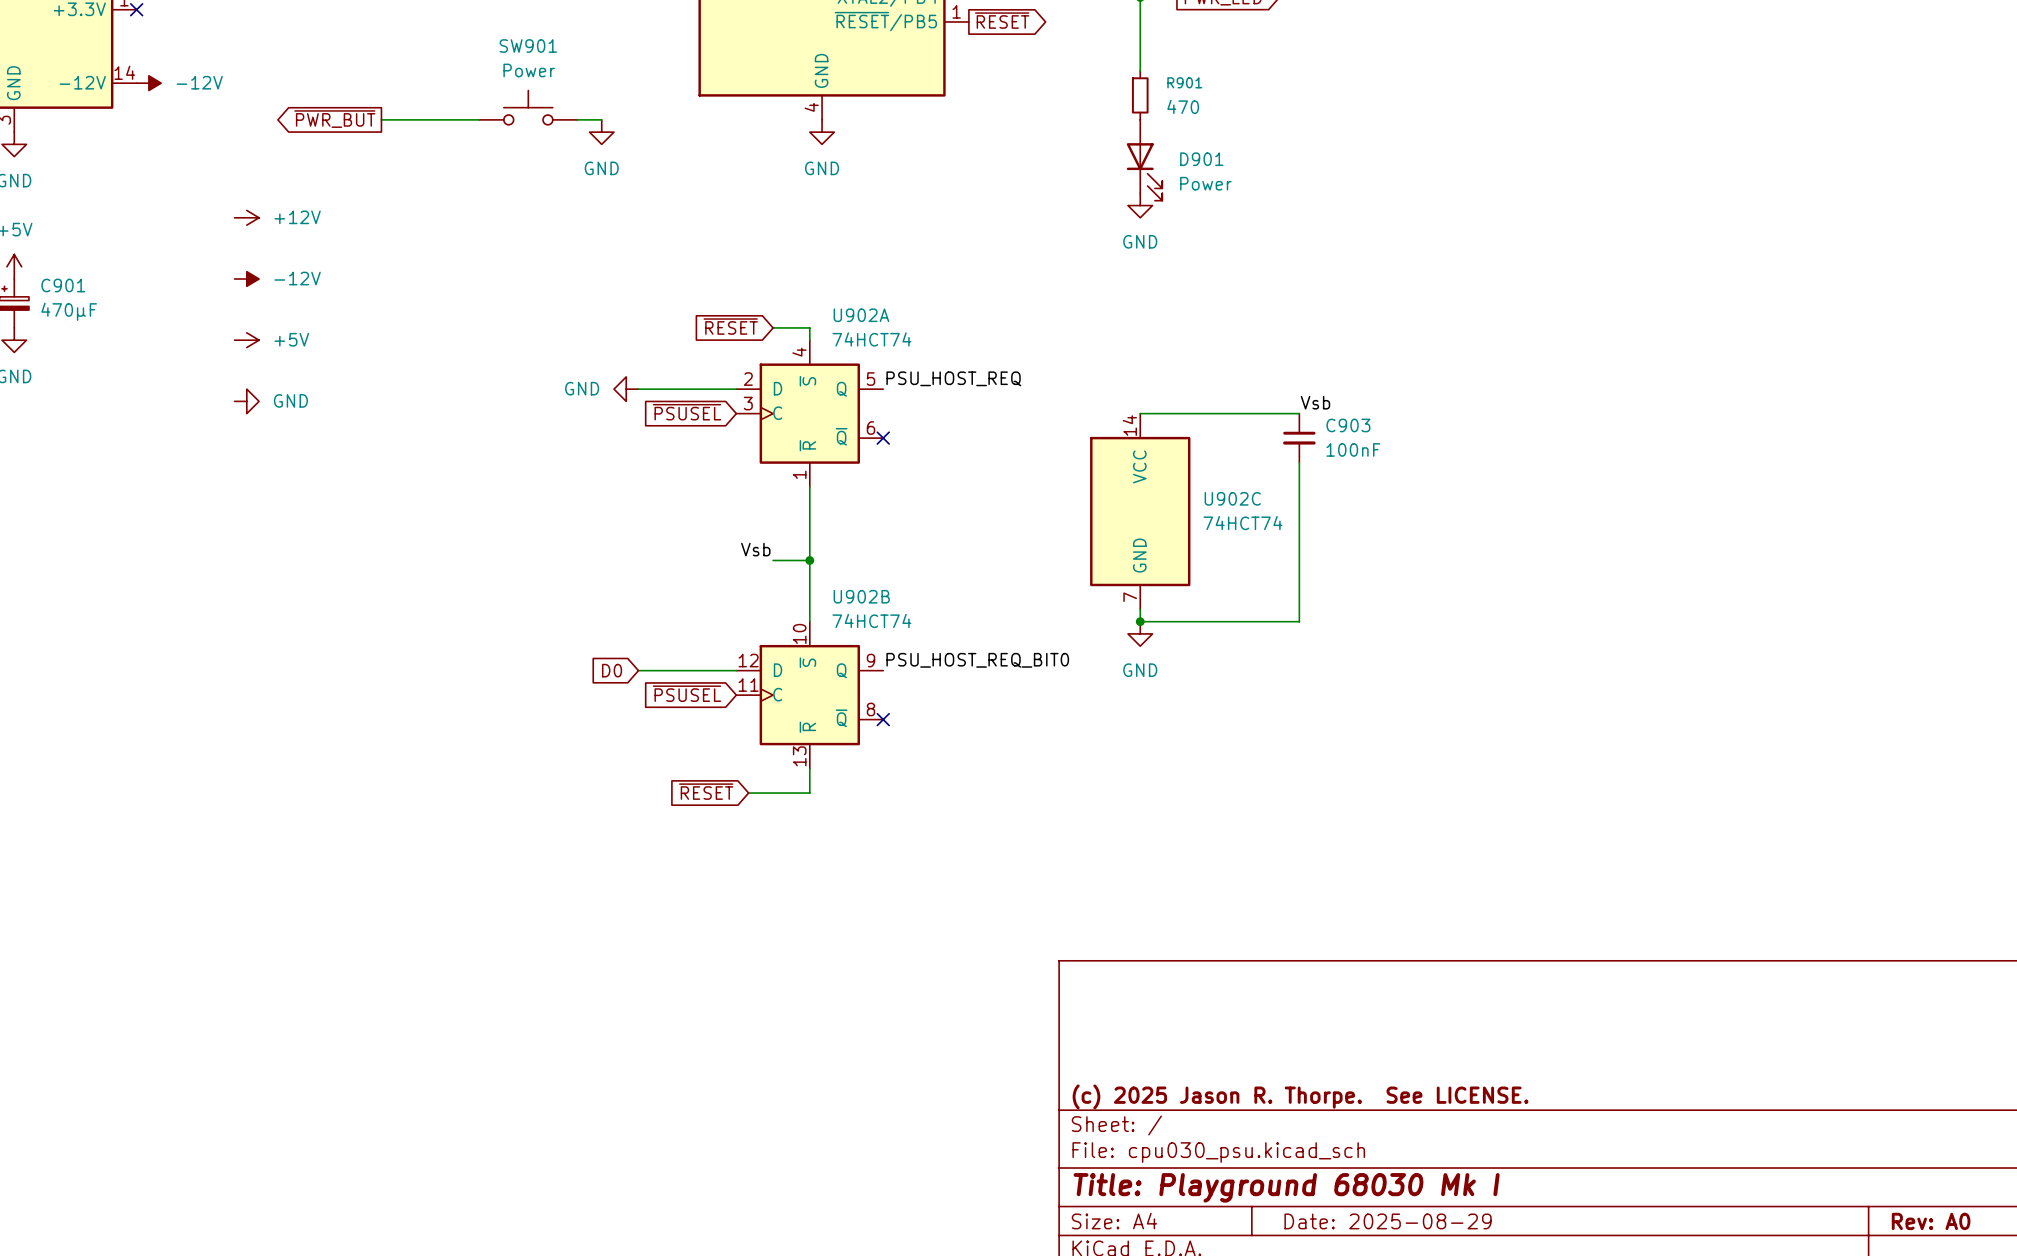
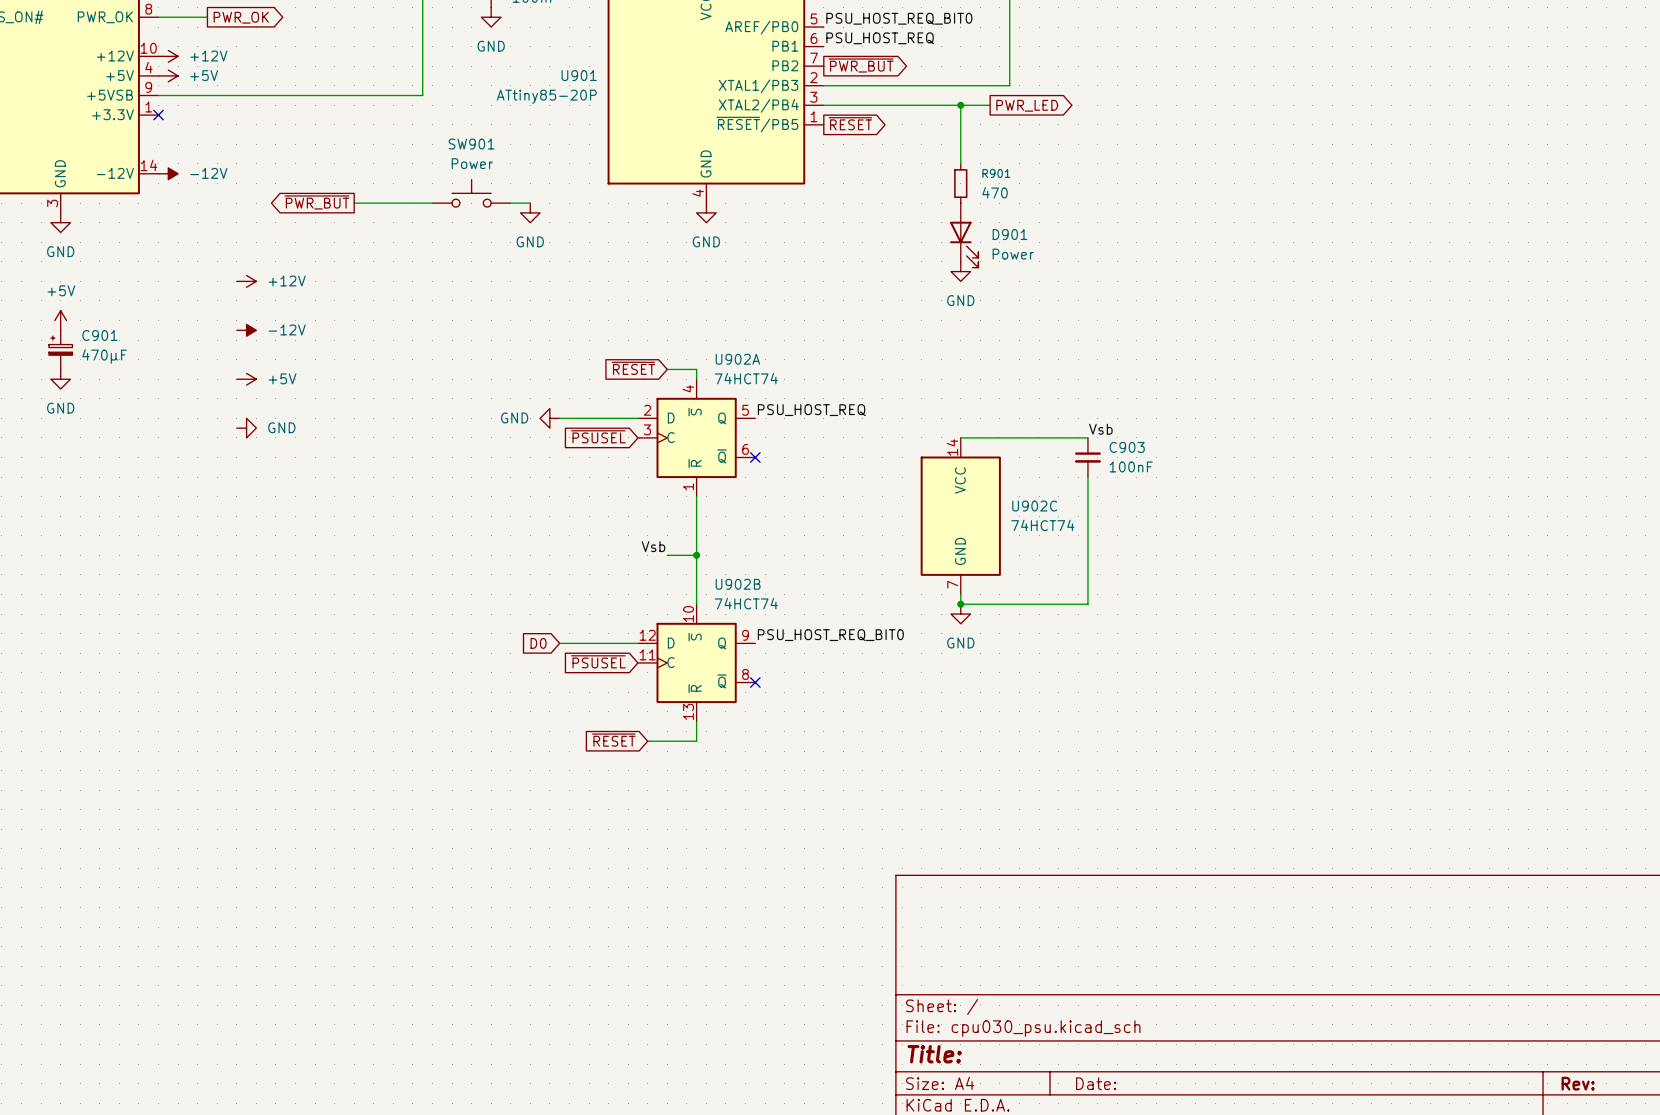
title block: (c) 2025 Jason R. Thorpe. See LICENSE. (1300, 1096) -> none
title block: Title: Playground 68030 Mk I (1286, 1187) -> Title: (934, 1054)
title block: Date: 2025-08-29 (1388, 1221) -> Date: (1096, 1083)
title block: Rev: A0 (1931, 1221) -> Rev: (1578, 1083)

